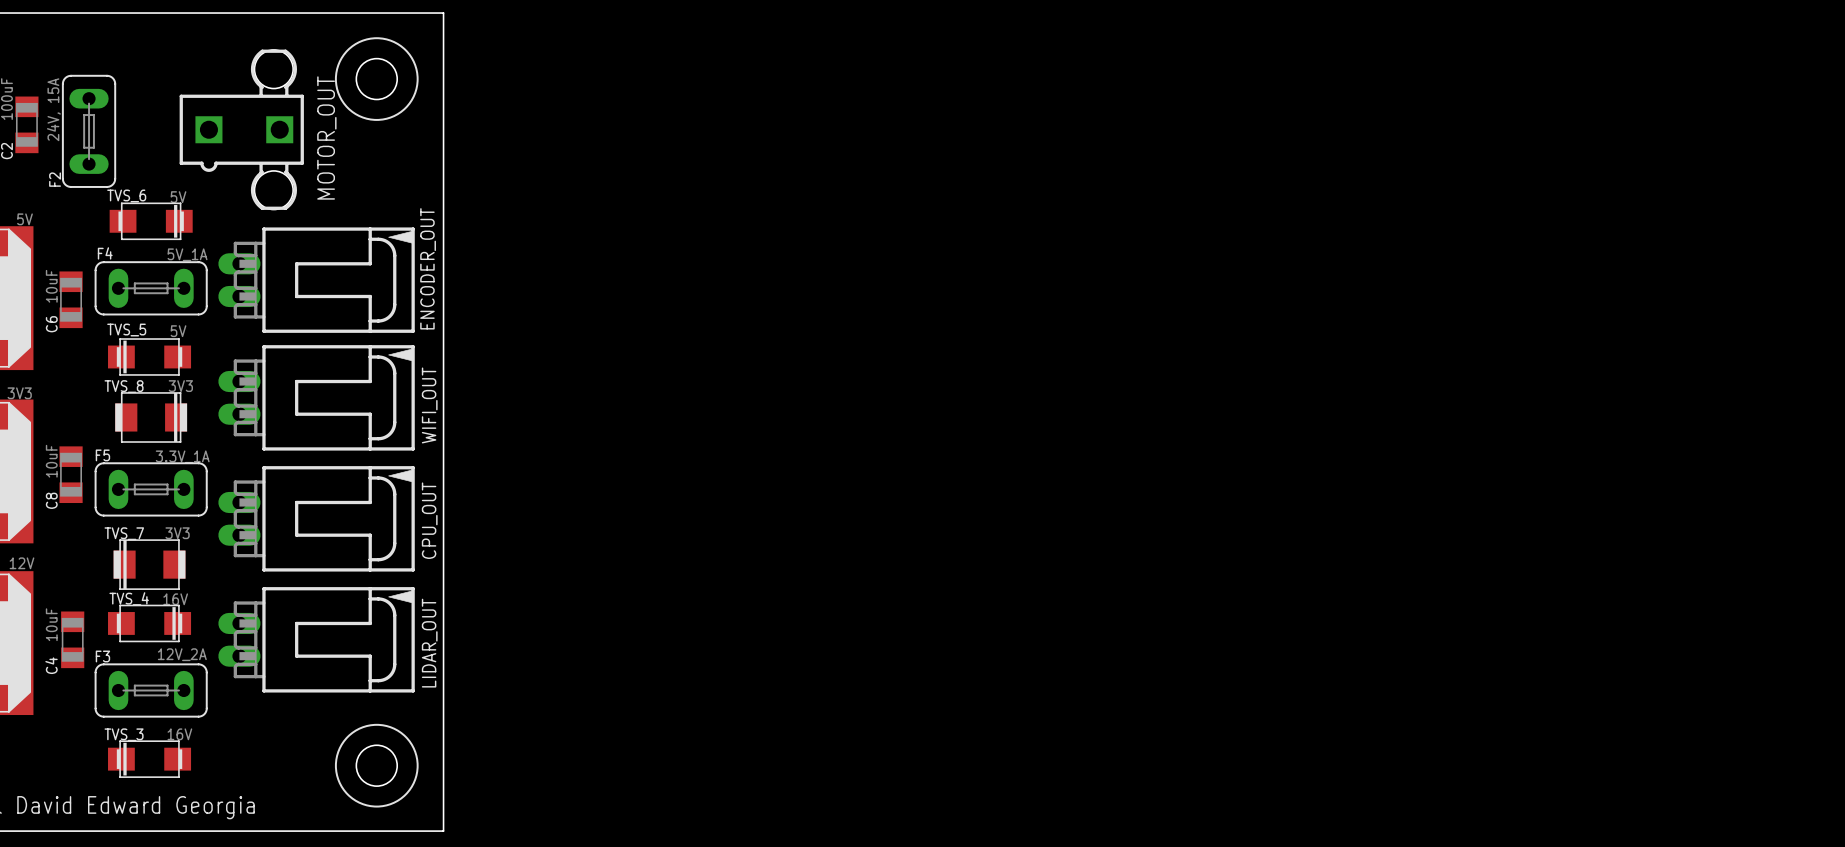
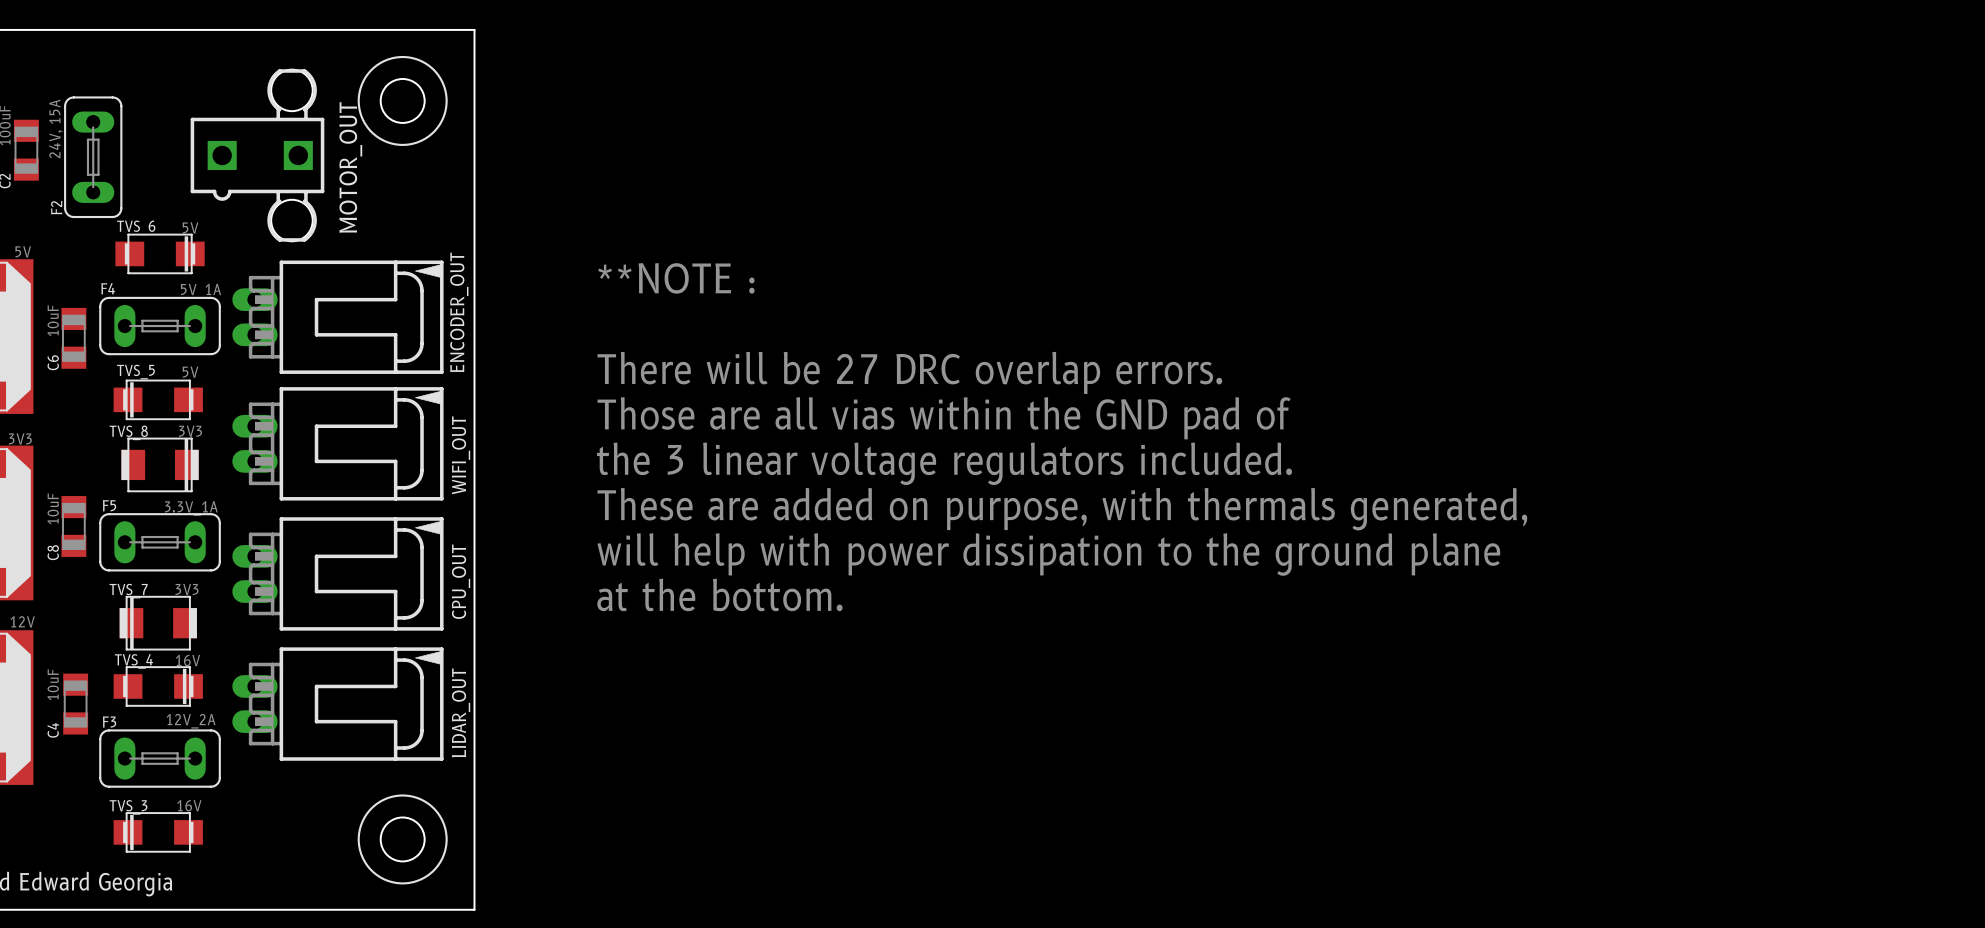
text: none -> **NOTE : (676, 278)
text: none -> There will be 27 DRC overlap errors. (909, 372)
text: none -> Those are all vias within the GND pad of (944, 418)
text: none -> the 3 linear voltage regulators included. (944, 463)
text: none -> These are added on purpose, with thermals generated, (1062, 509)
text: none -> will help with power dissipation to the ground plane (1048, 554)
text: none -> at the bottom. (719, 594)

